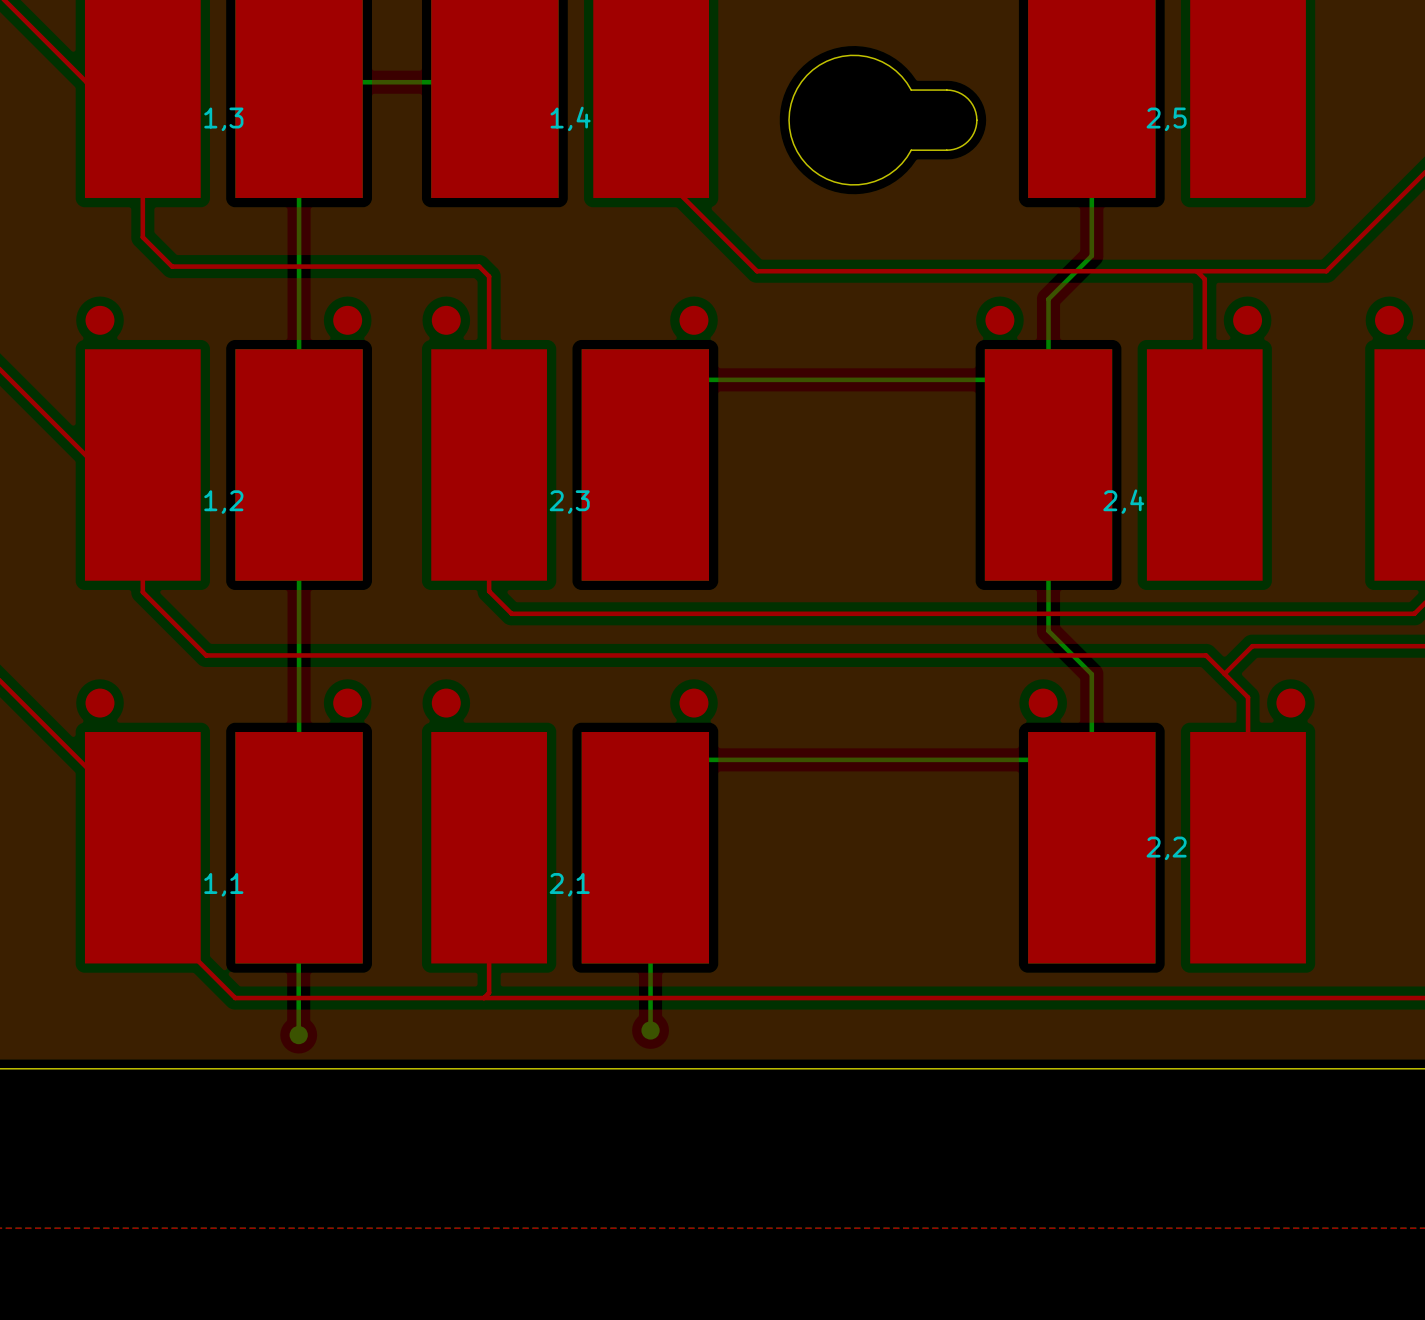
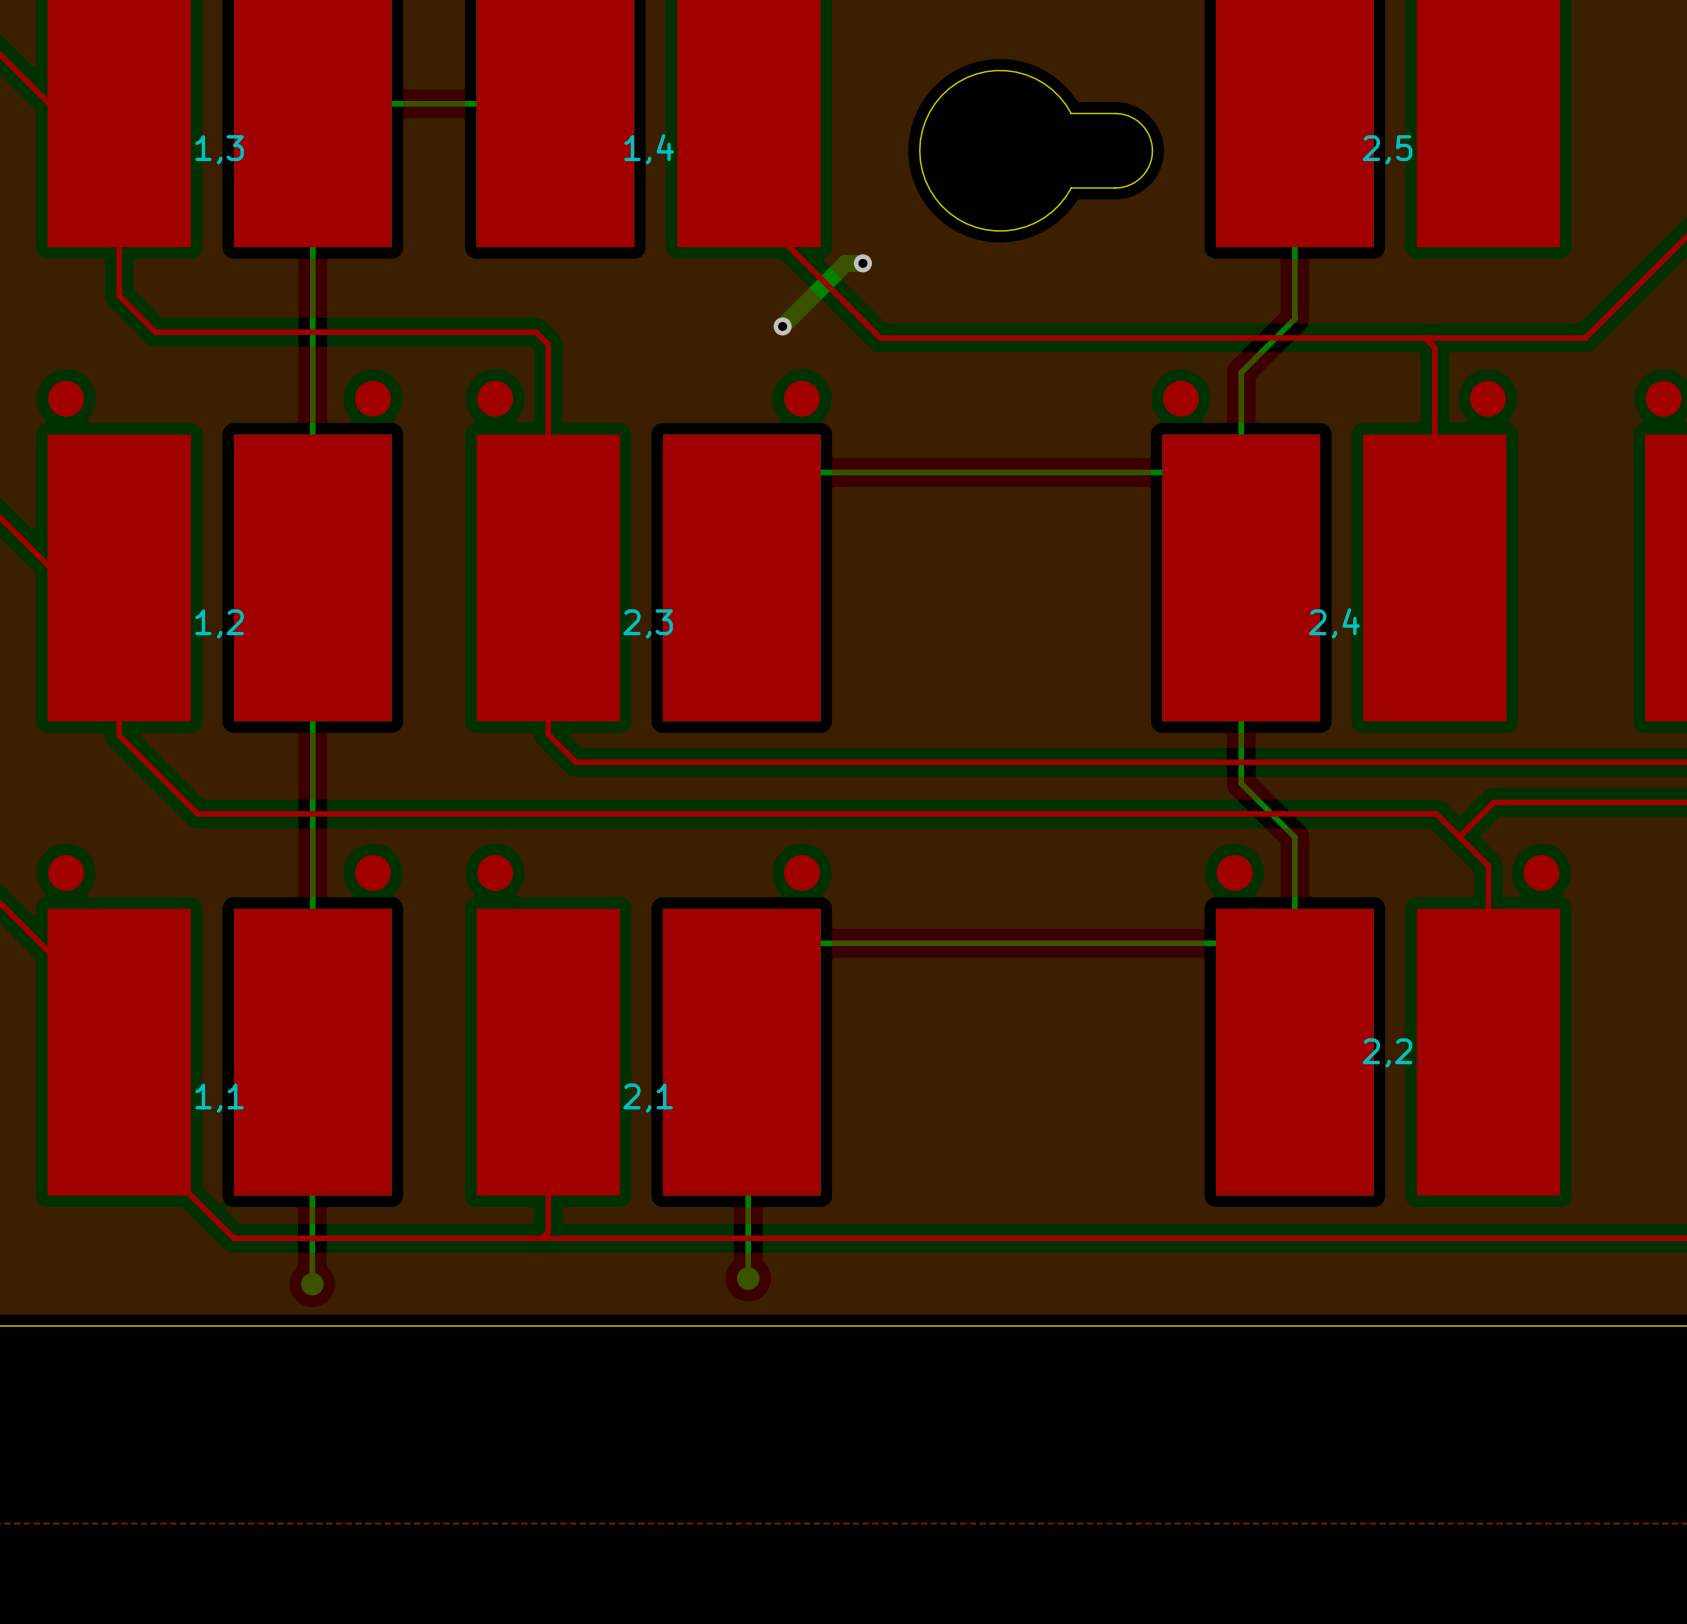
bottom track: none -> (862, 263) (845, 263) (782, 326)
via: none -> (862, 263)
via: none -> (782, 326)

